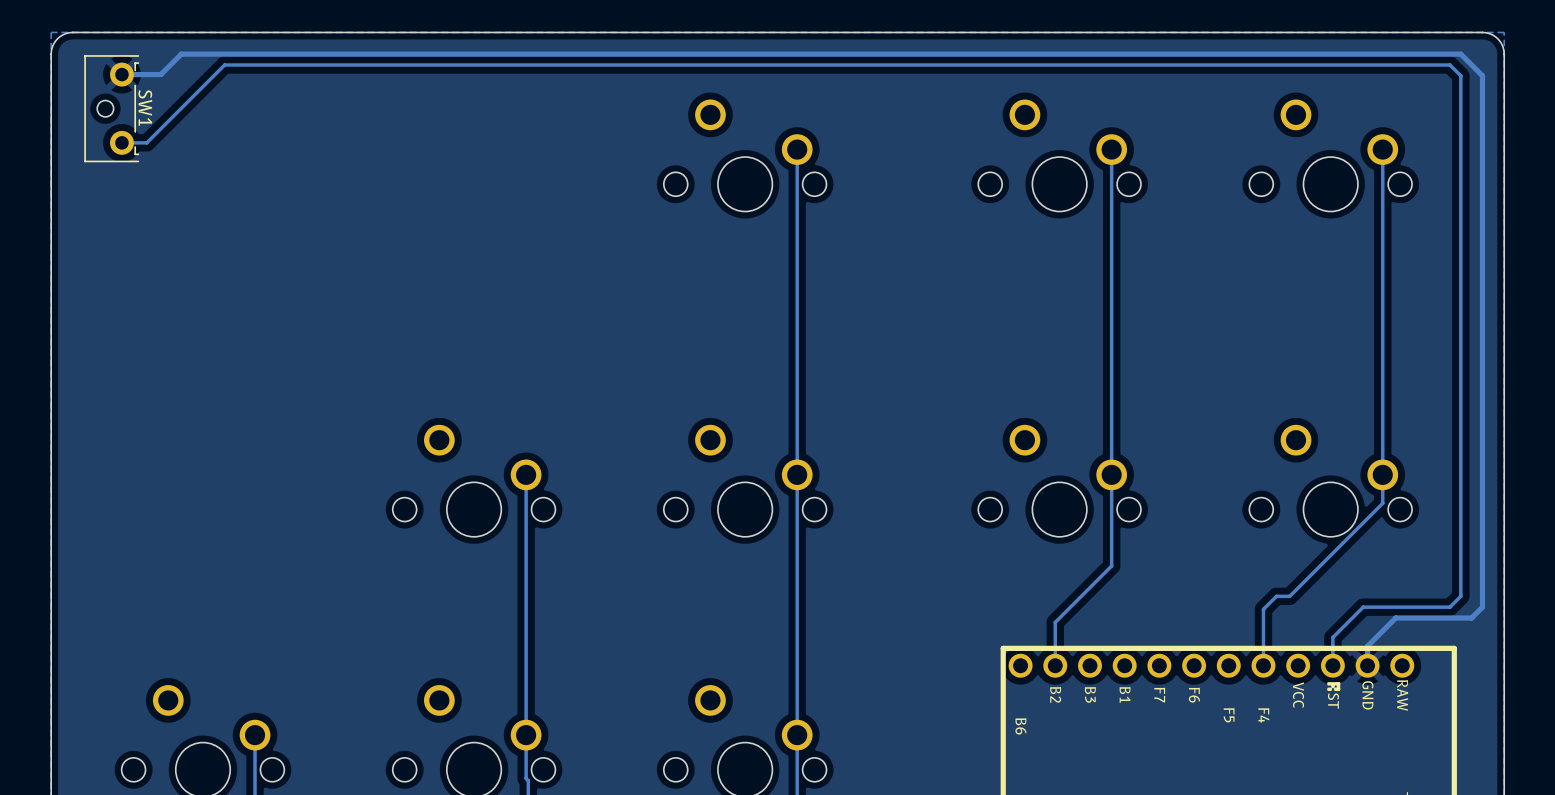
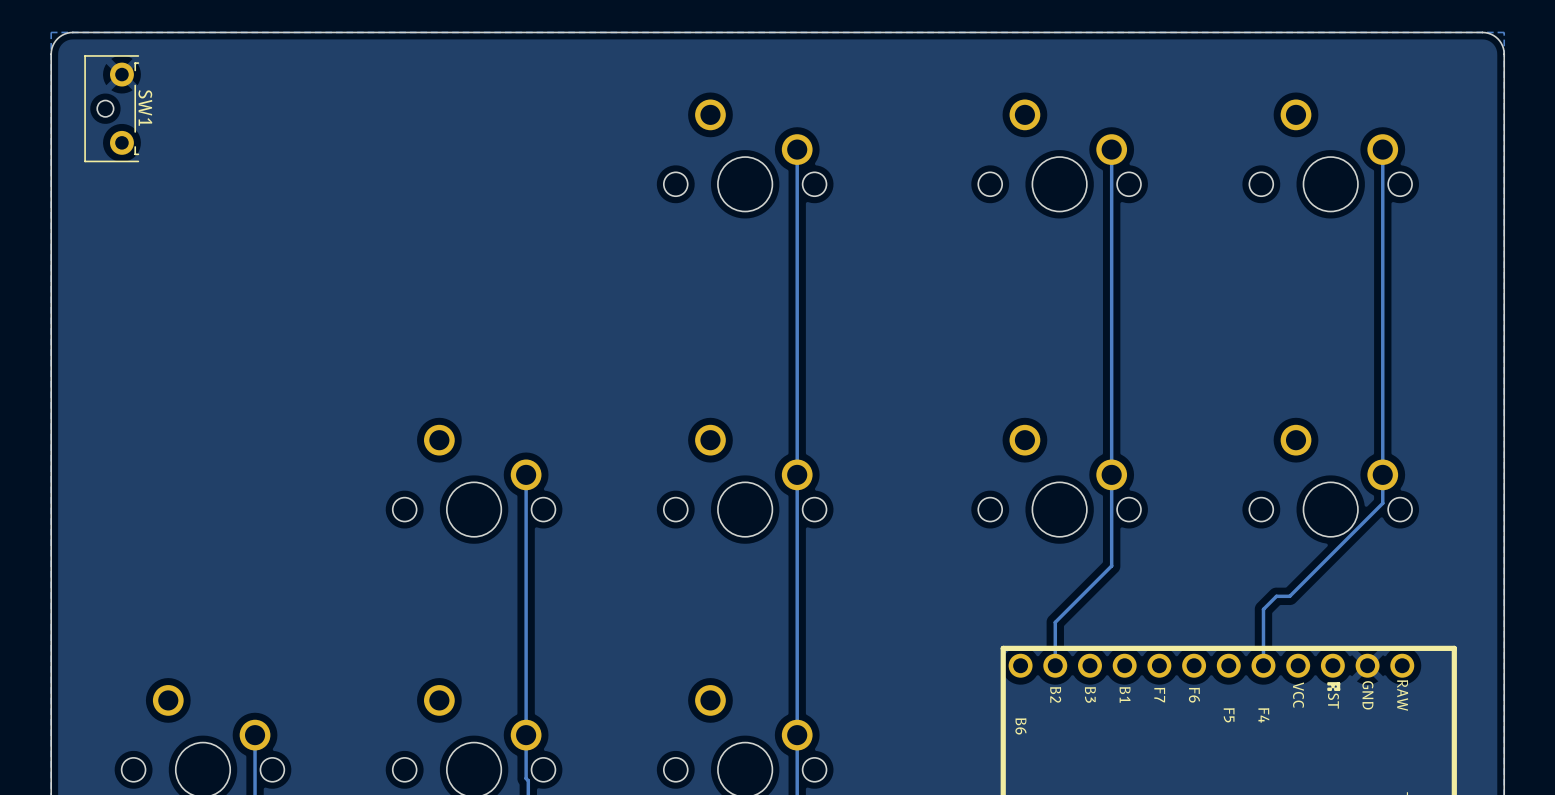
track: (121, 74) (160, 74) (181, 54) (1460, 54) (1482, 75) (1482, 607) (1471, 618) (1395, 618) (1367, 646) (1367, 665) -> none
track: (121, 142) (146, 142) (224, 65) (1449, 65) (1460, 75) (1460, 596) (1449, 607) (1363, 607) (1332, 637) (1332, 665) -> none

